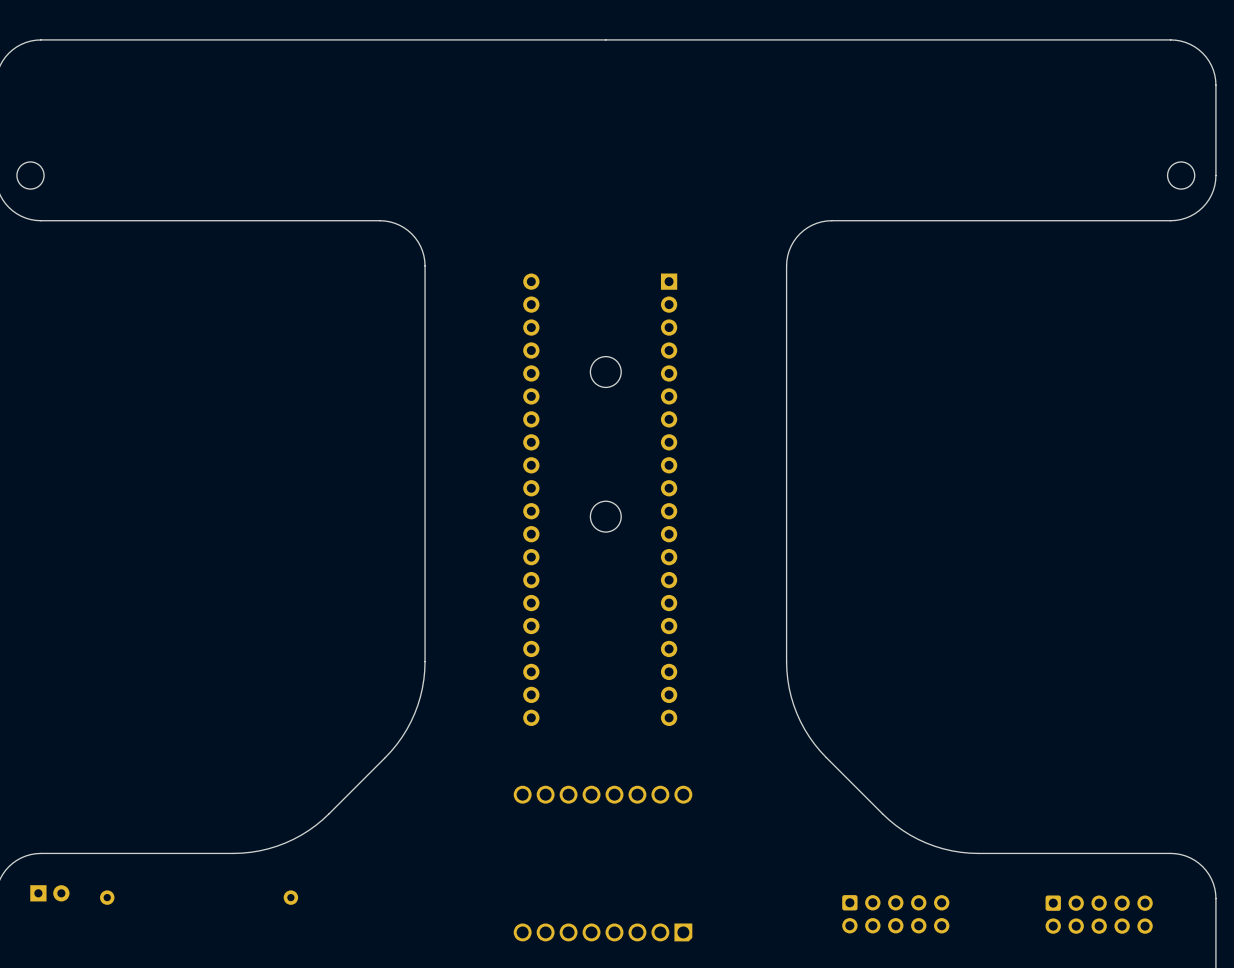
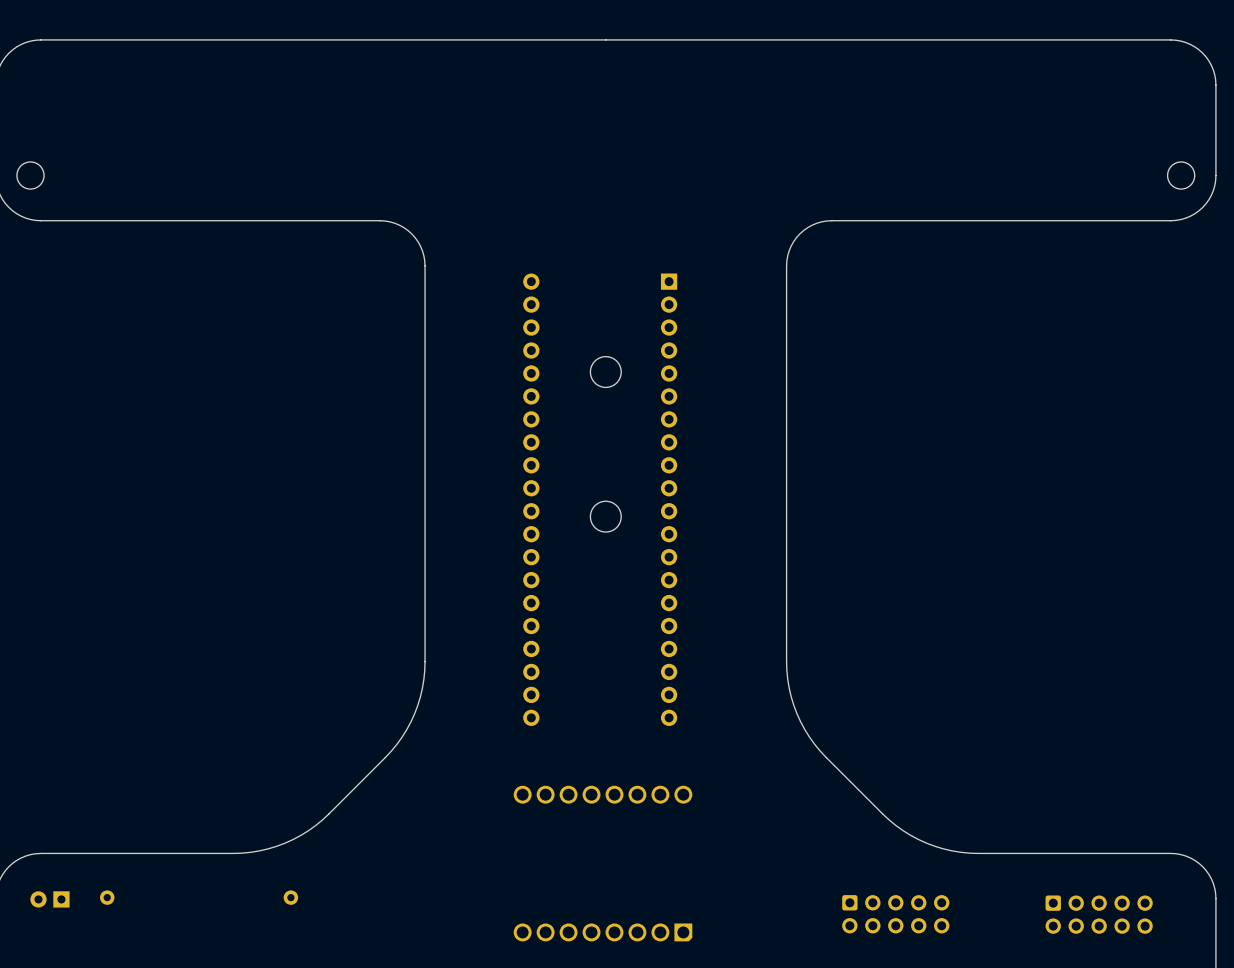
part rotation: 0° (49, 893) -> 180° (49, 899)

